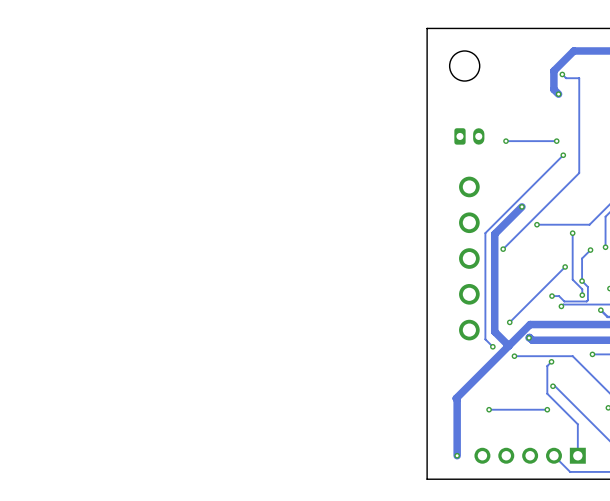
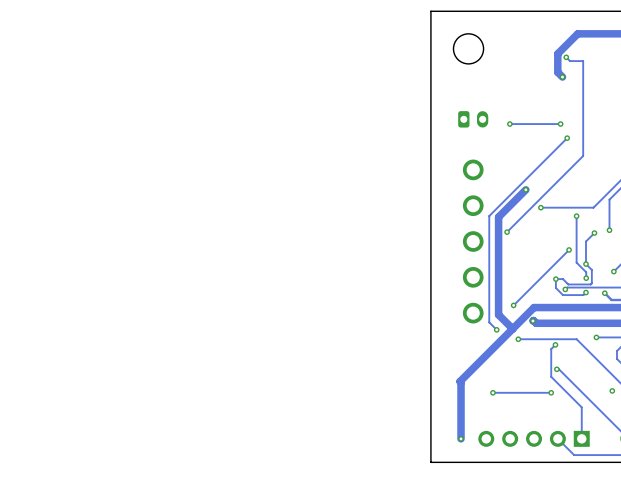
track: none -> (555, 279) (555, 288) (562, 295) (583, 295) (585, 292)
via: none -> (585, 292)

